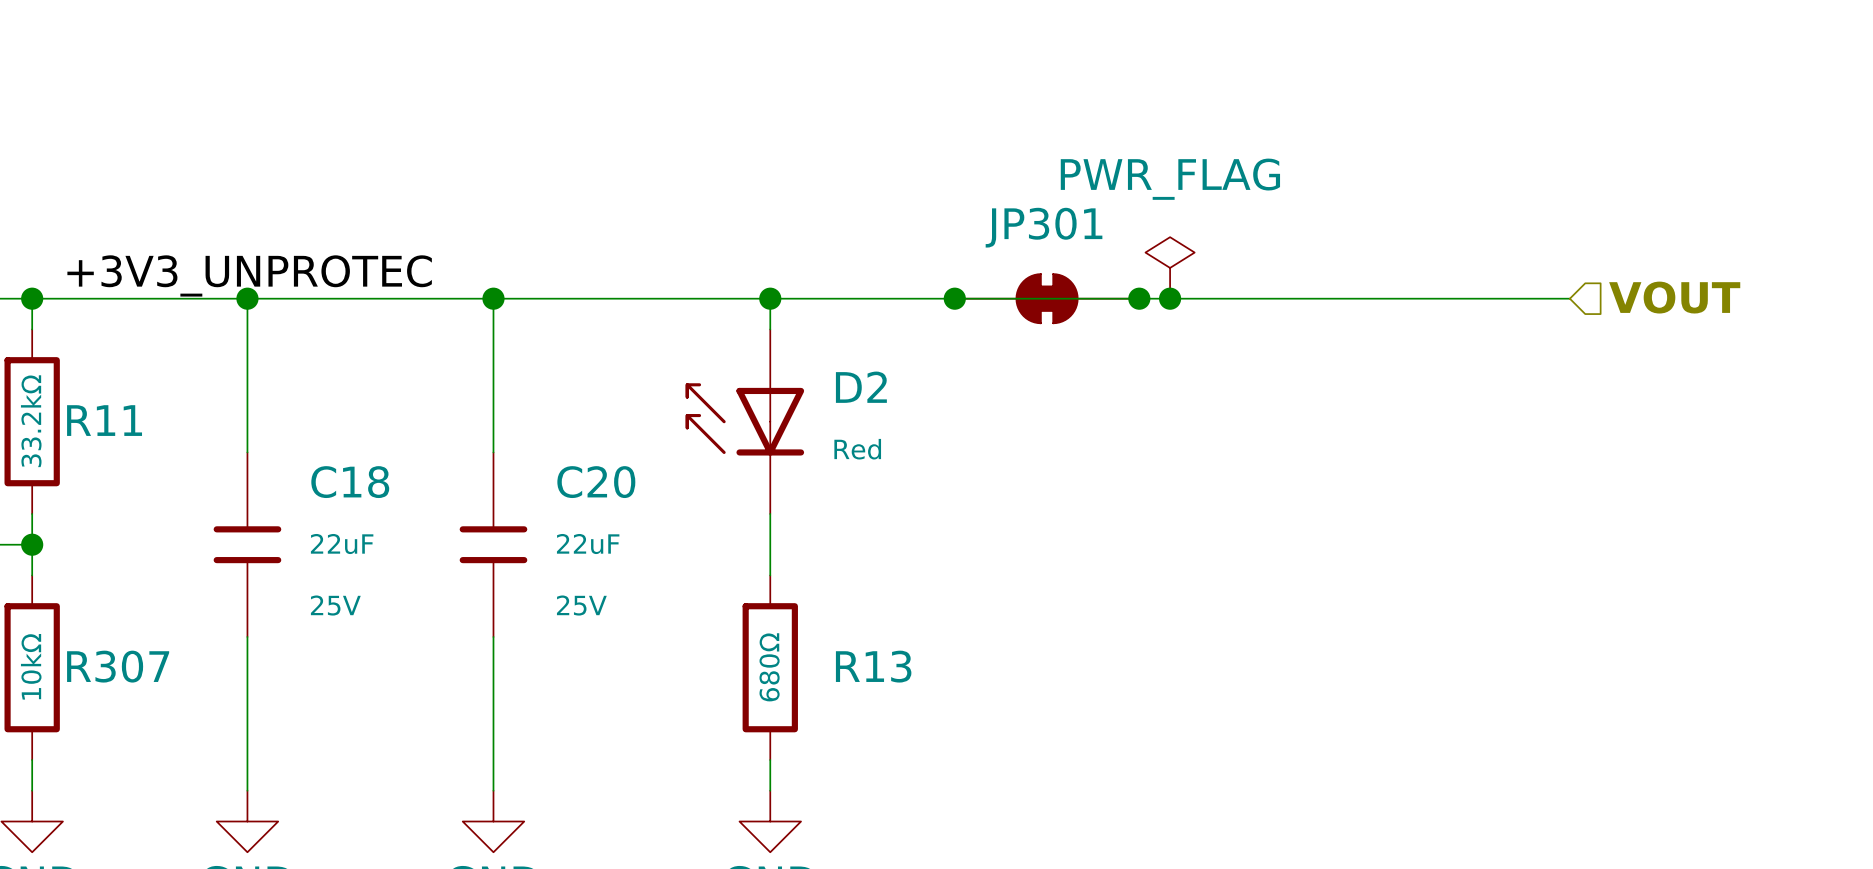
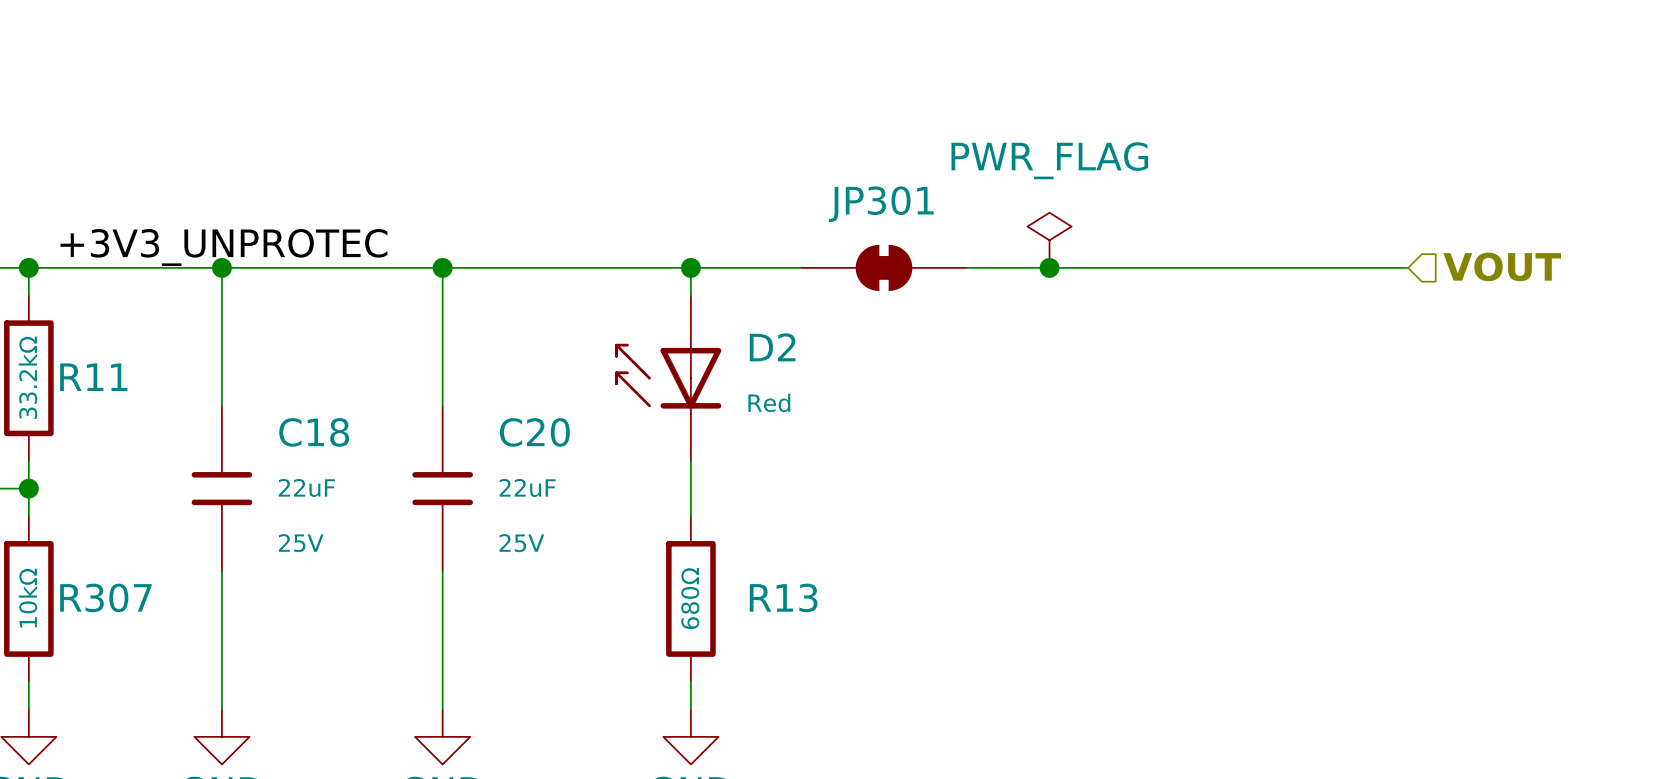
junction: (954, 298) -> none
JP301 position: (1047, 298) -> (884, 267)
junction: (1139, 298) -> none

